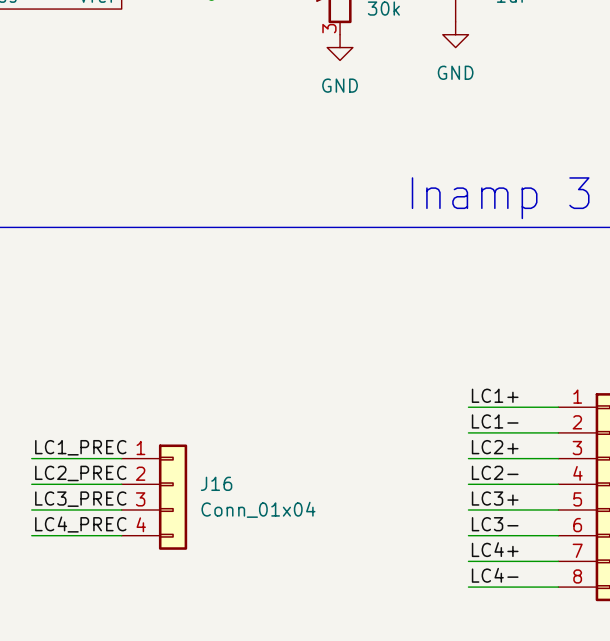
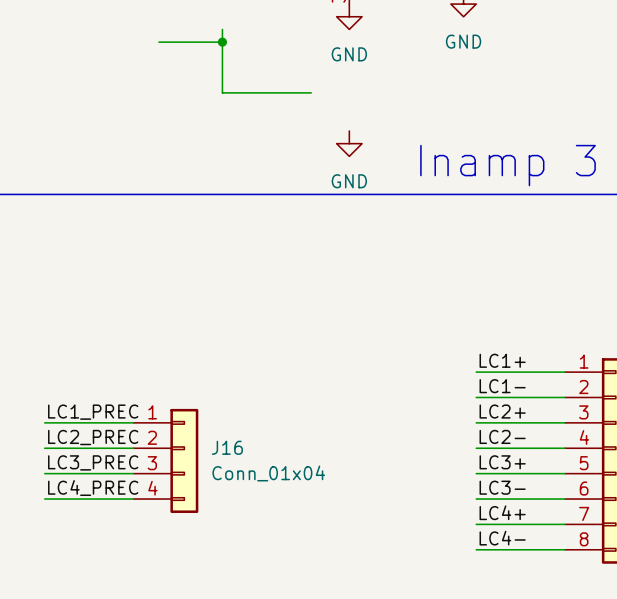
wire: none -> (222, 29) (222, 92) (311, 92)
wire: none -> (158, 42) (222, 42)
junction: none -> (222, 42)
power symbol: none -> GND (349, 143)

